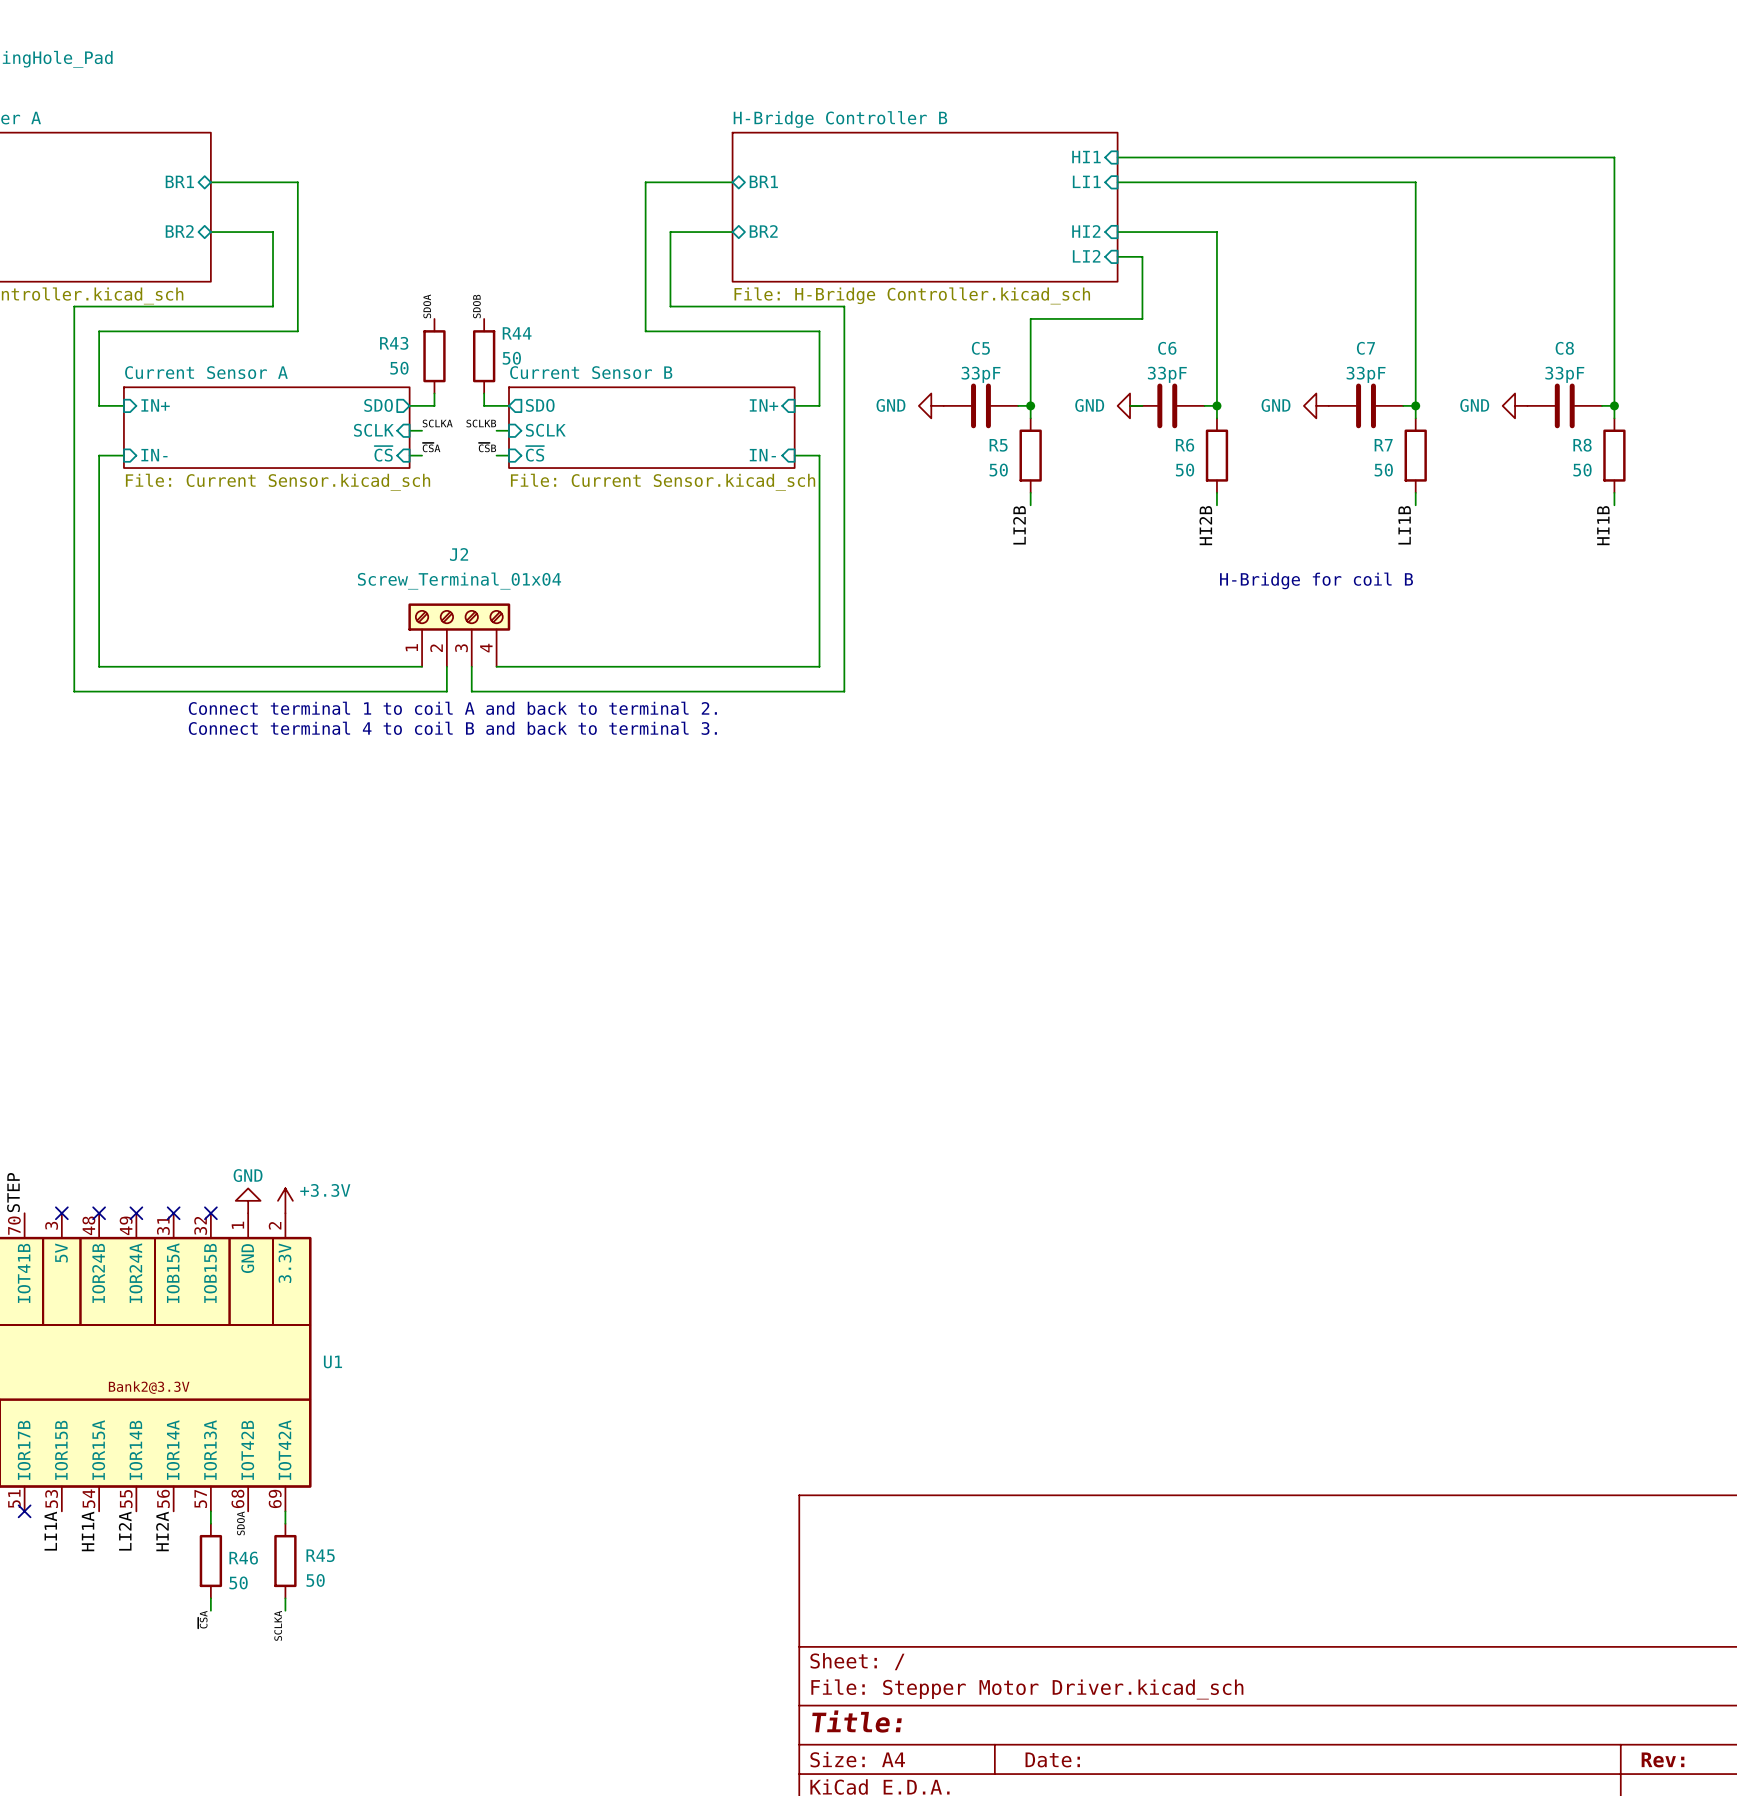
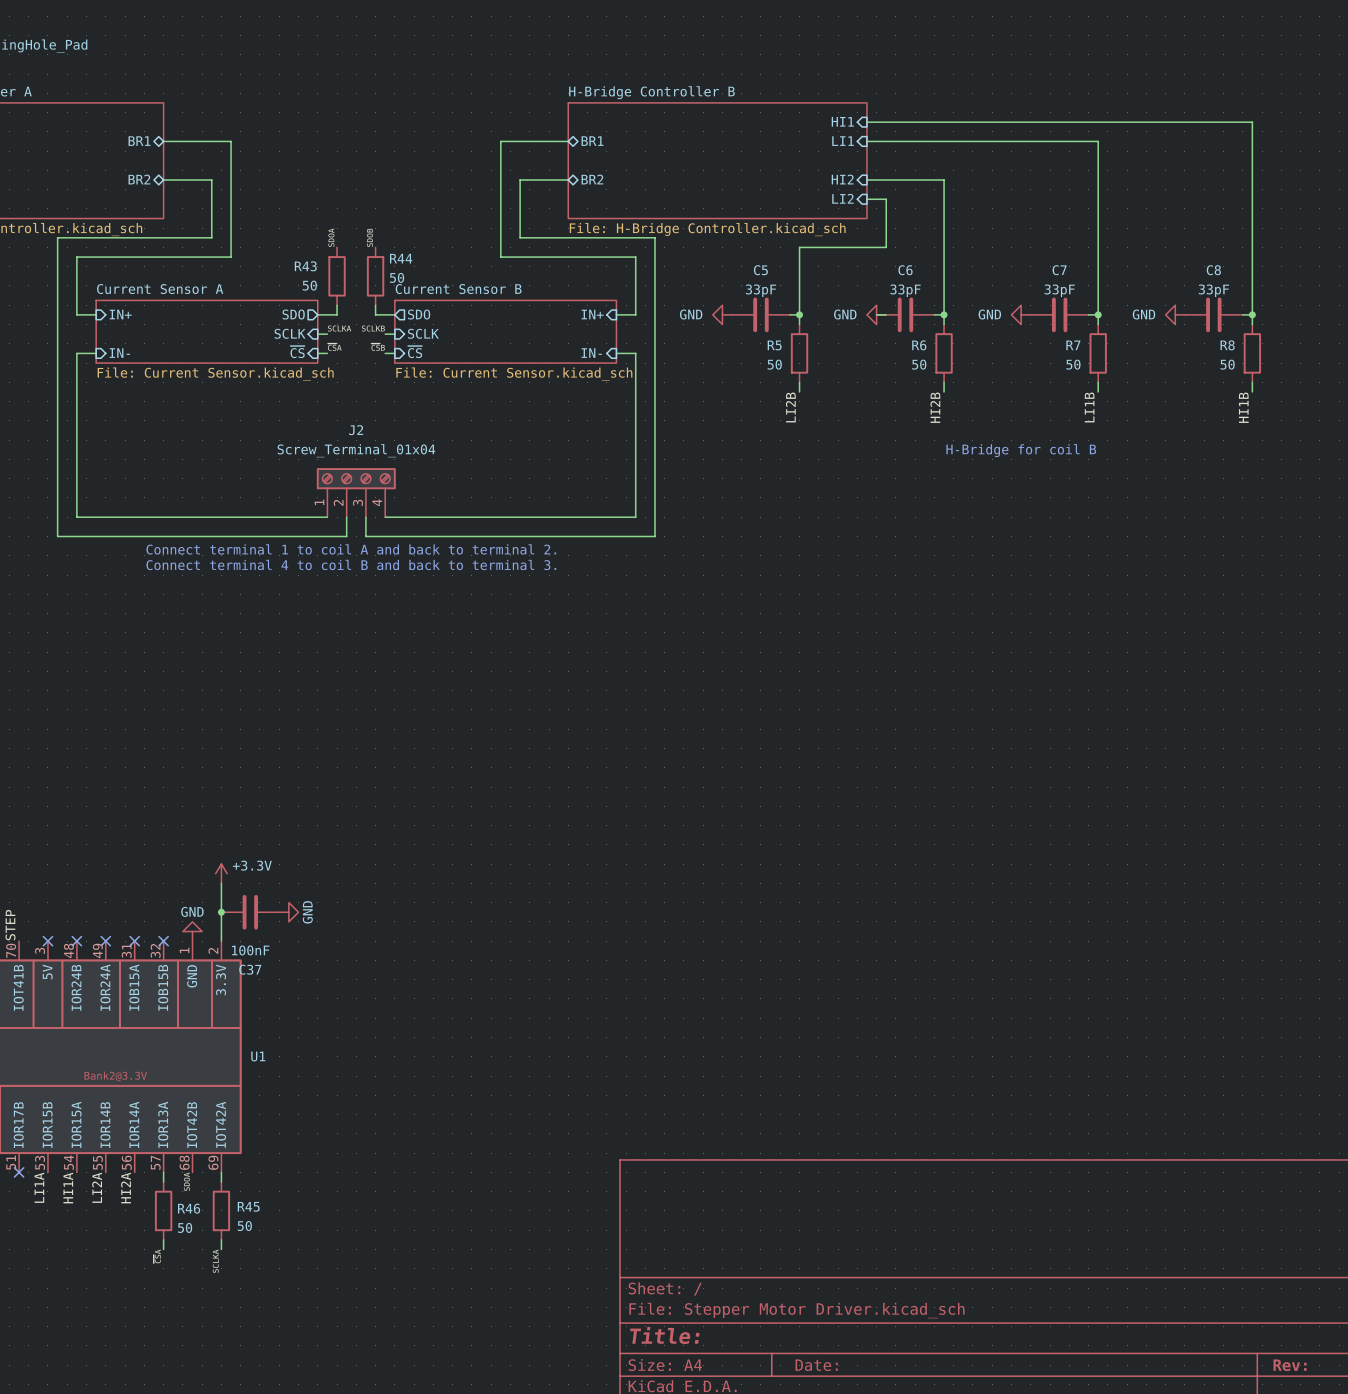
wire: none -> (221, 883) (221, 941)
junction: none -> (221, 912)
C37: none -> 100nF (250, 912)
power symbol: none -> GND (288, 912)
power symbol position: +3.3V (285, 1200) -> +3.3V (221, 873)

